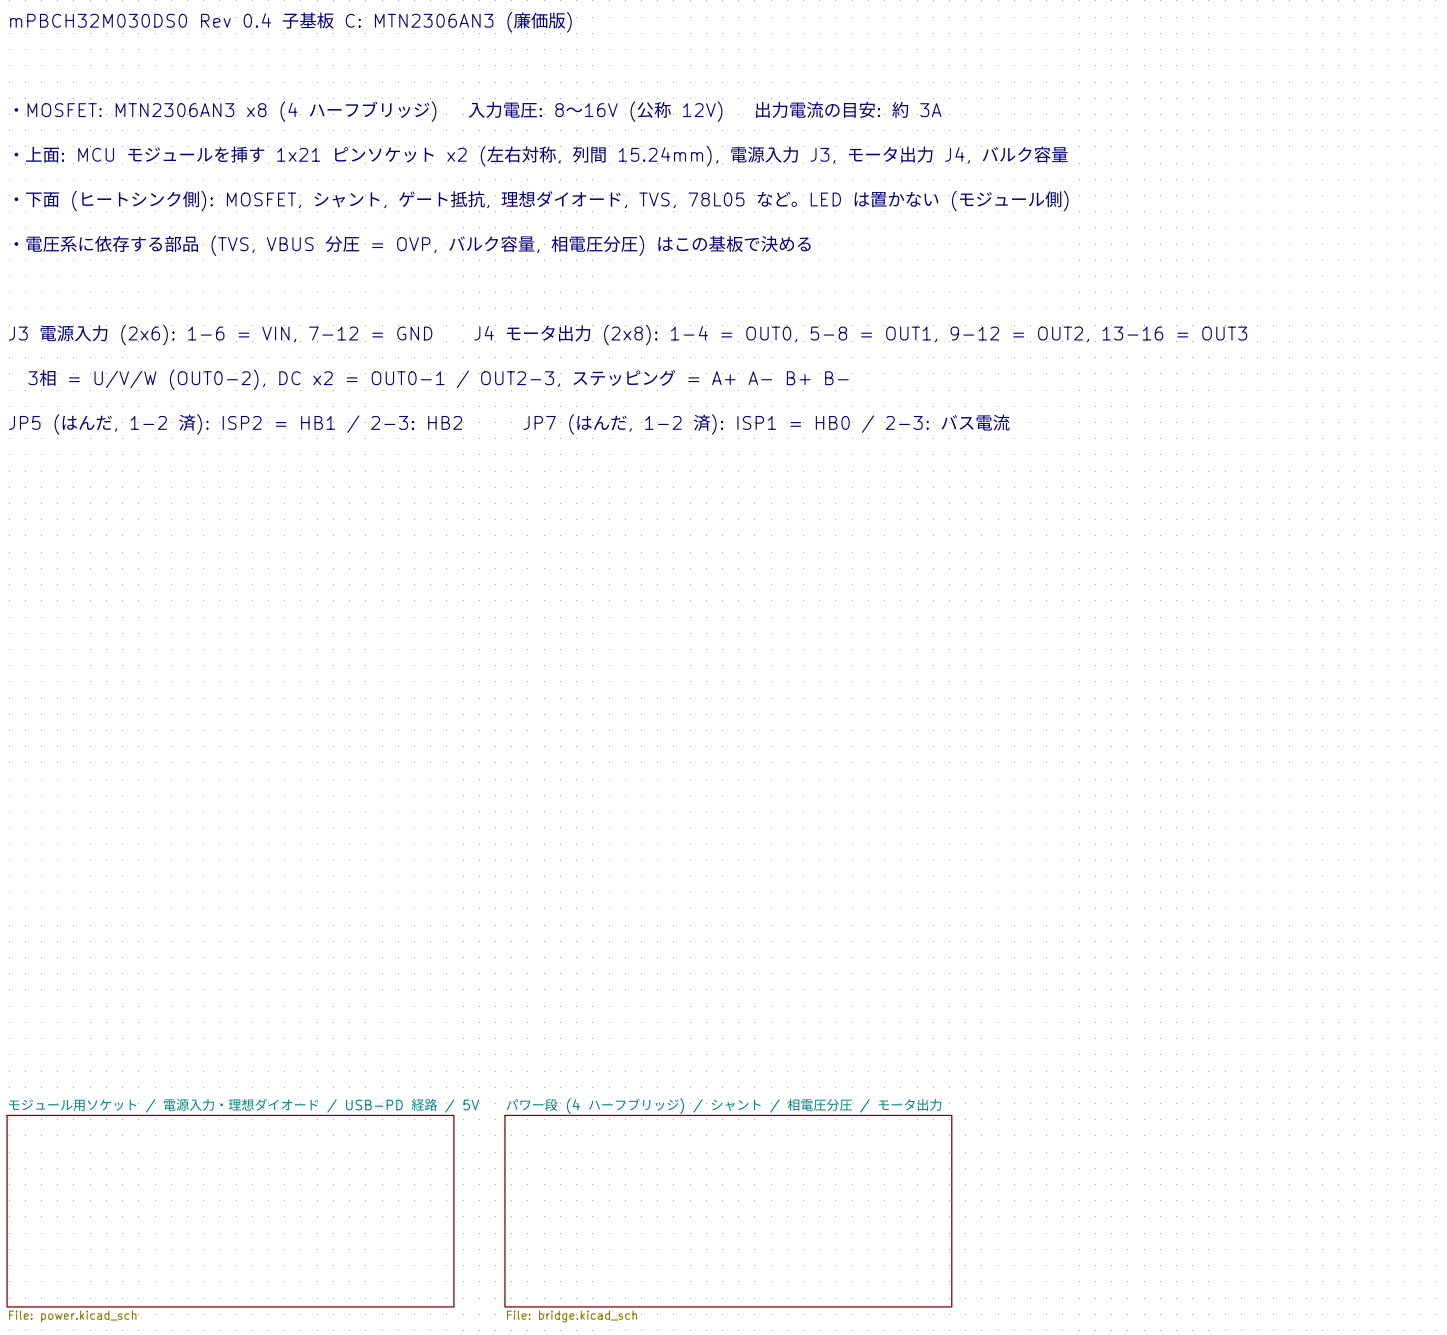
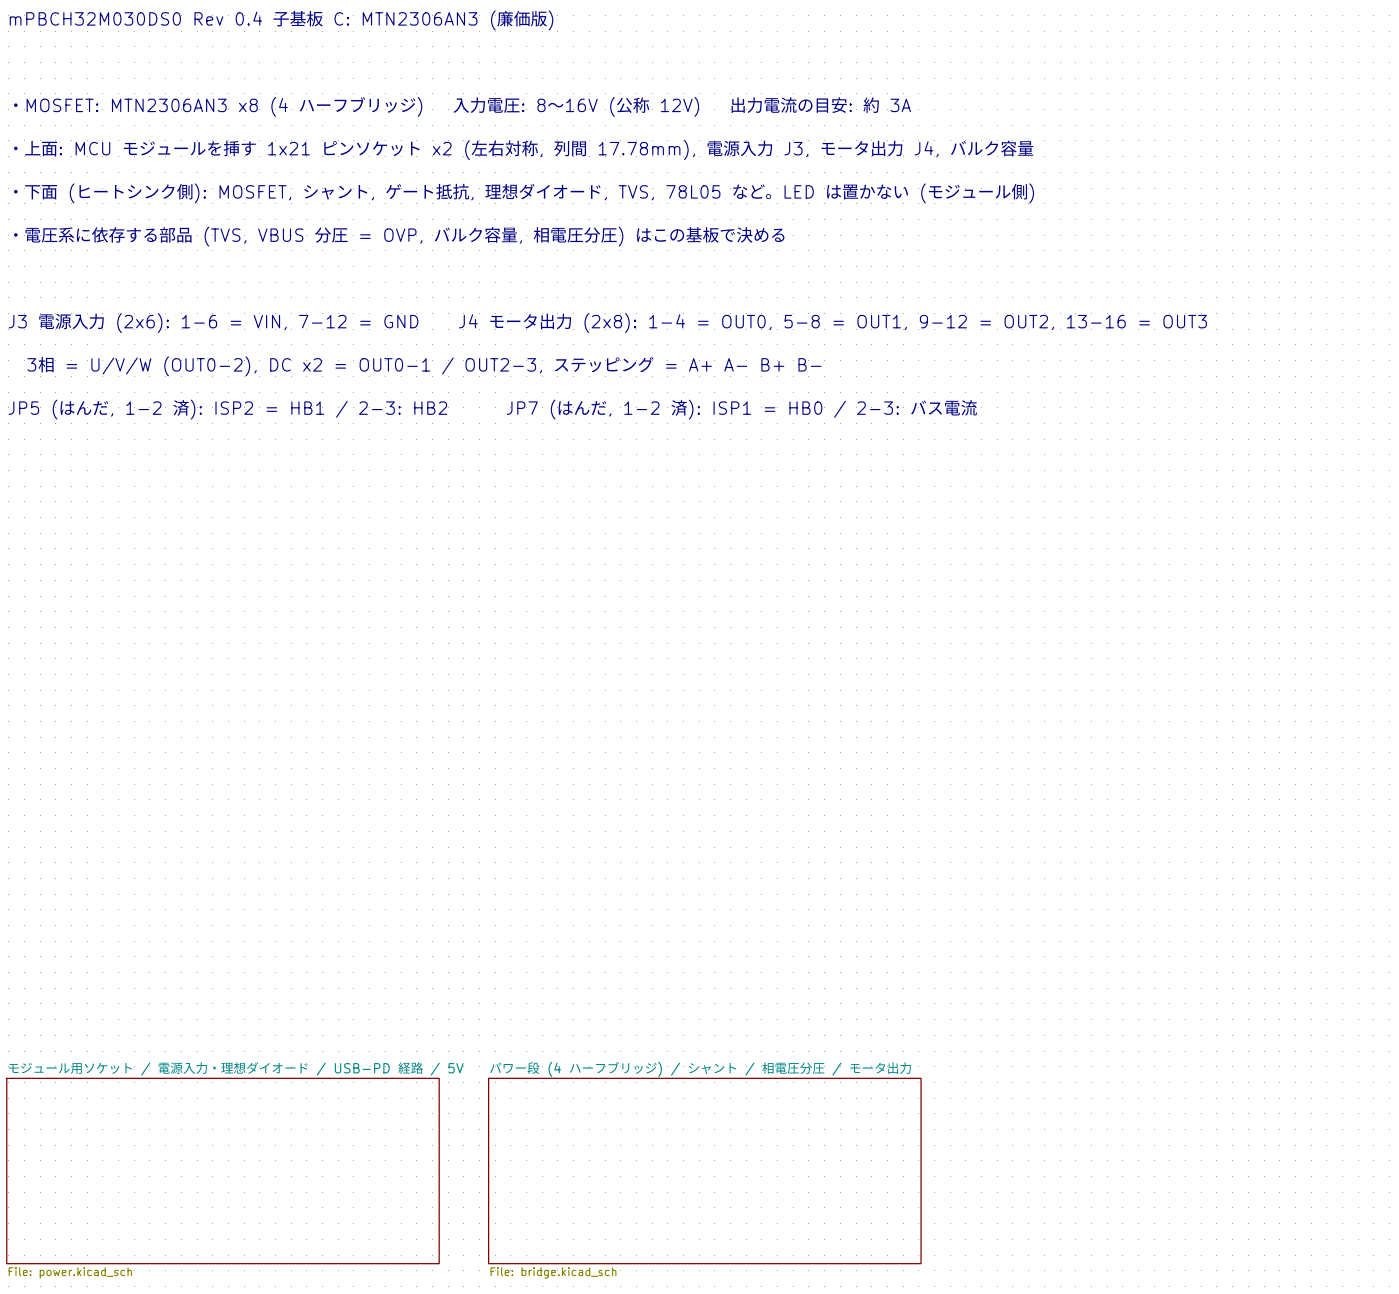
text: ・上面: MCU モジュールを挿す 1x21 ピンソケット x2 (左右対称, 列間 15.24mm), 電源入力 J3, モータ出力 J4, バルク容量 (541, 156) -> ・上面: MCU モジュールを挿す 1x21 ピンソケット x2 (左右対称, 列間 17.78mm), 電源入力 J3, モータ出力 J4, バルク容量 (523, 150)

